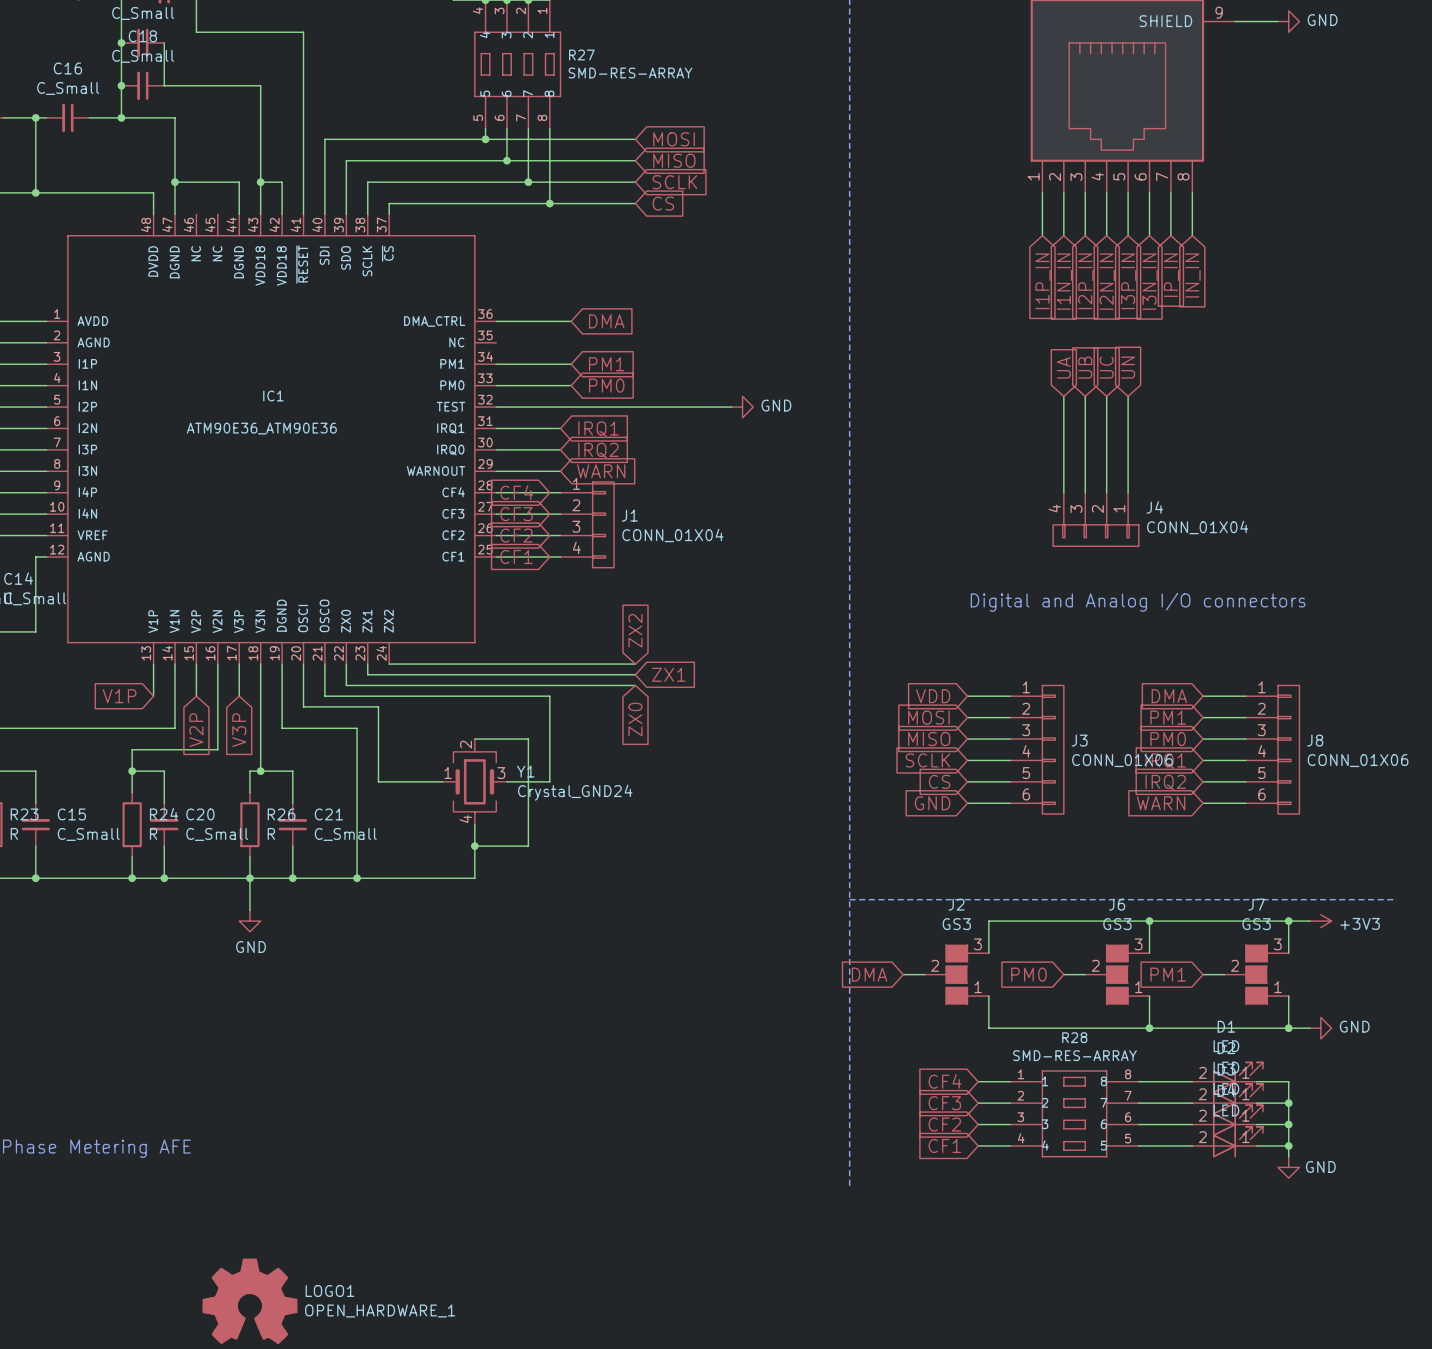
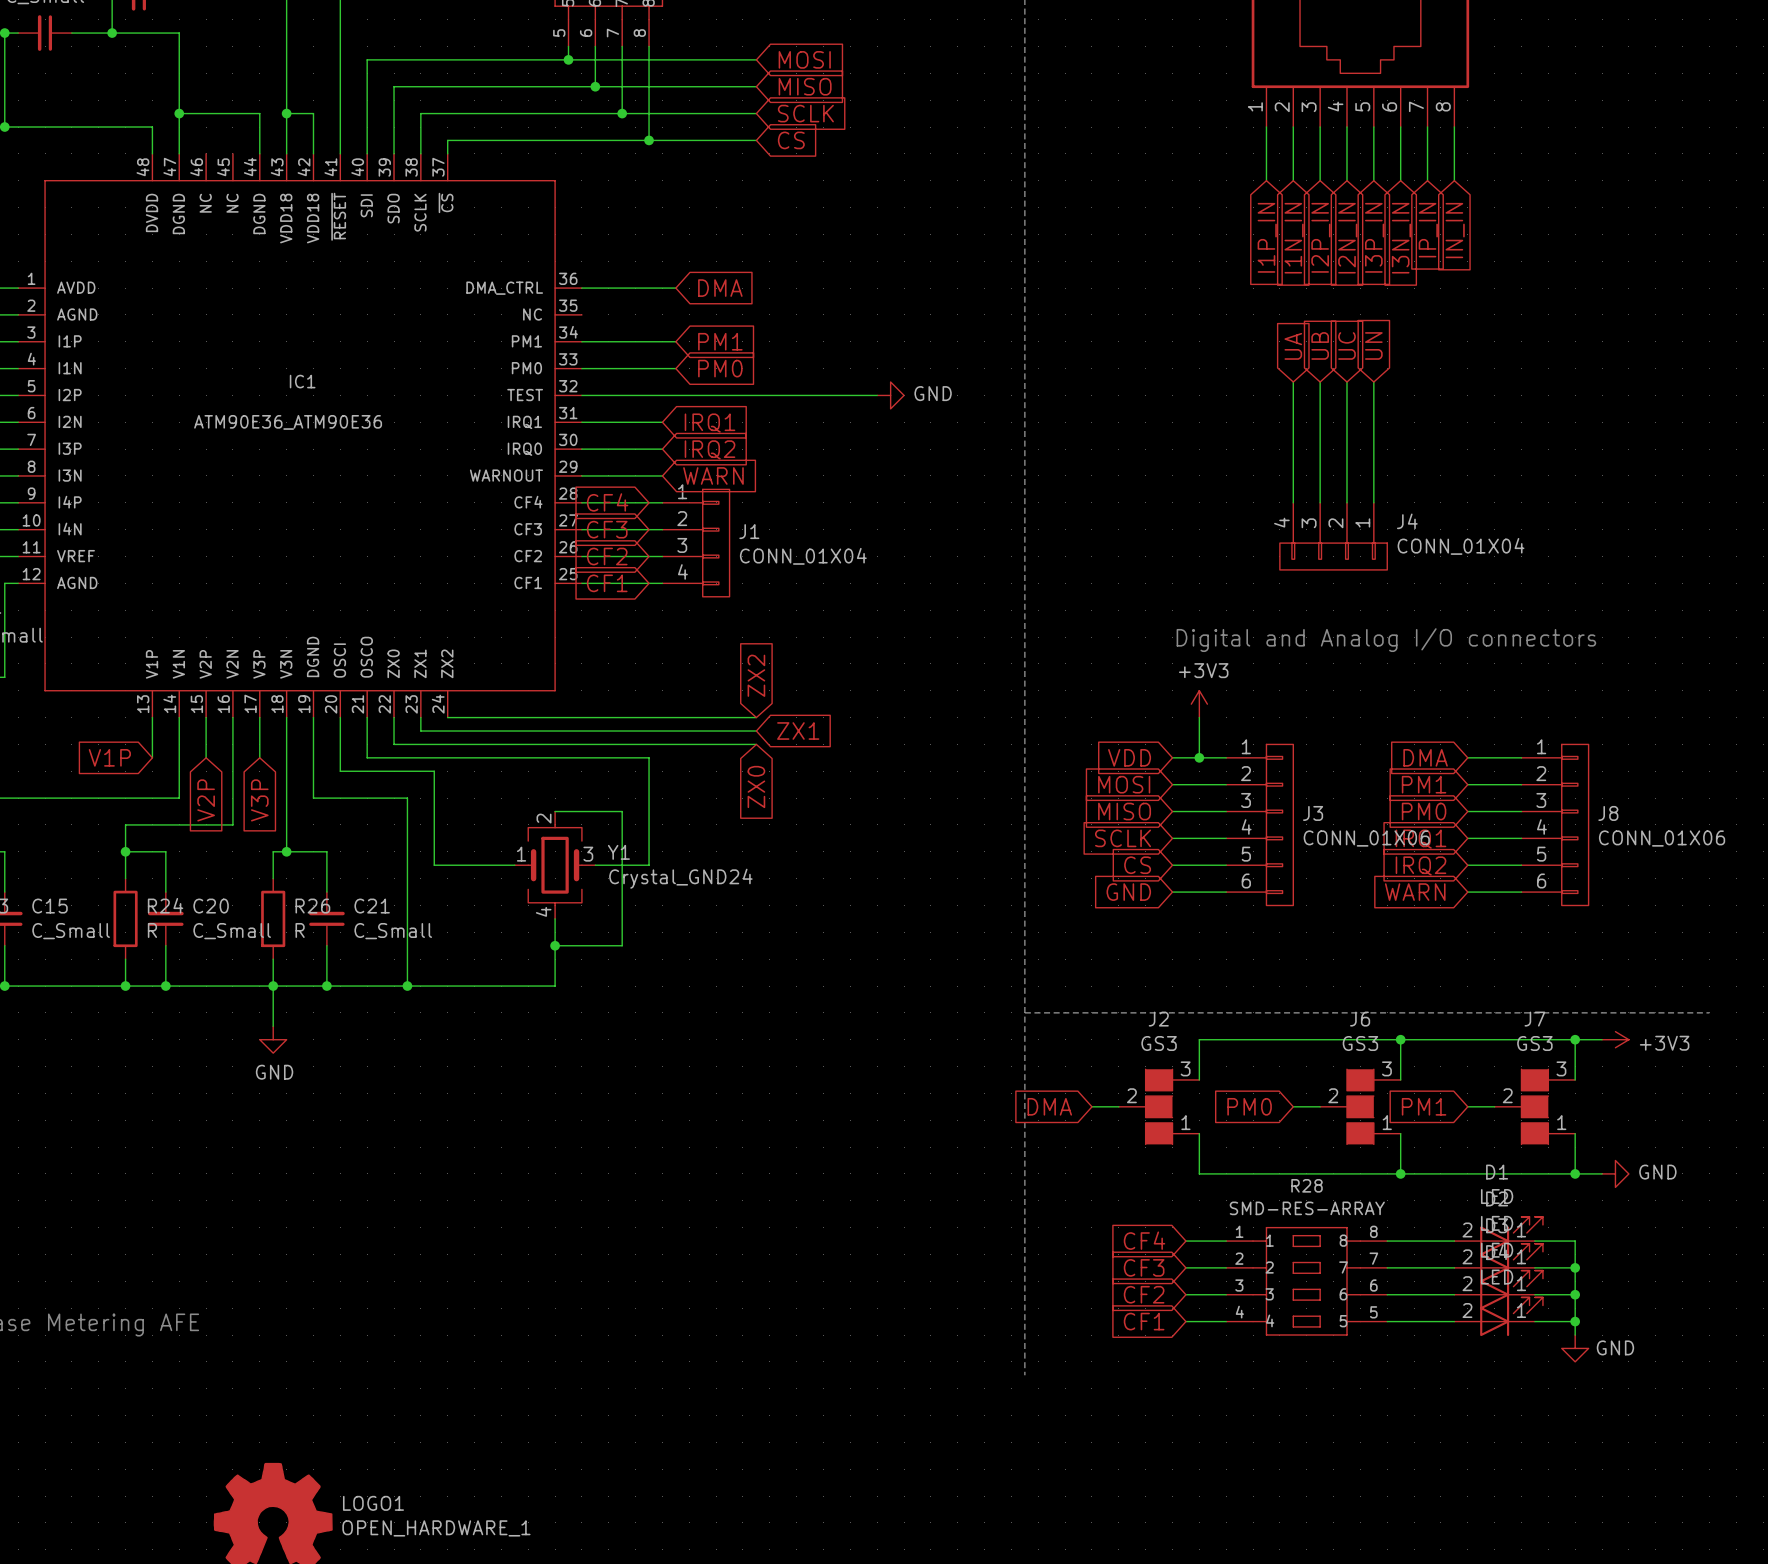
power symbol: none -> +3V3 (1199, 704)
wire: none -> (1199, 717) (1199, 757)
junction: none -> (1199, 757)

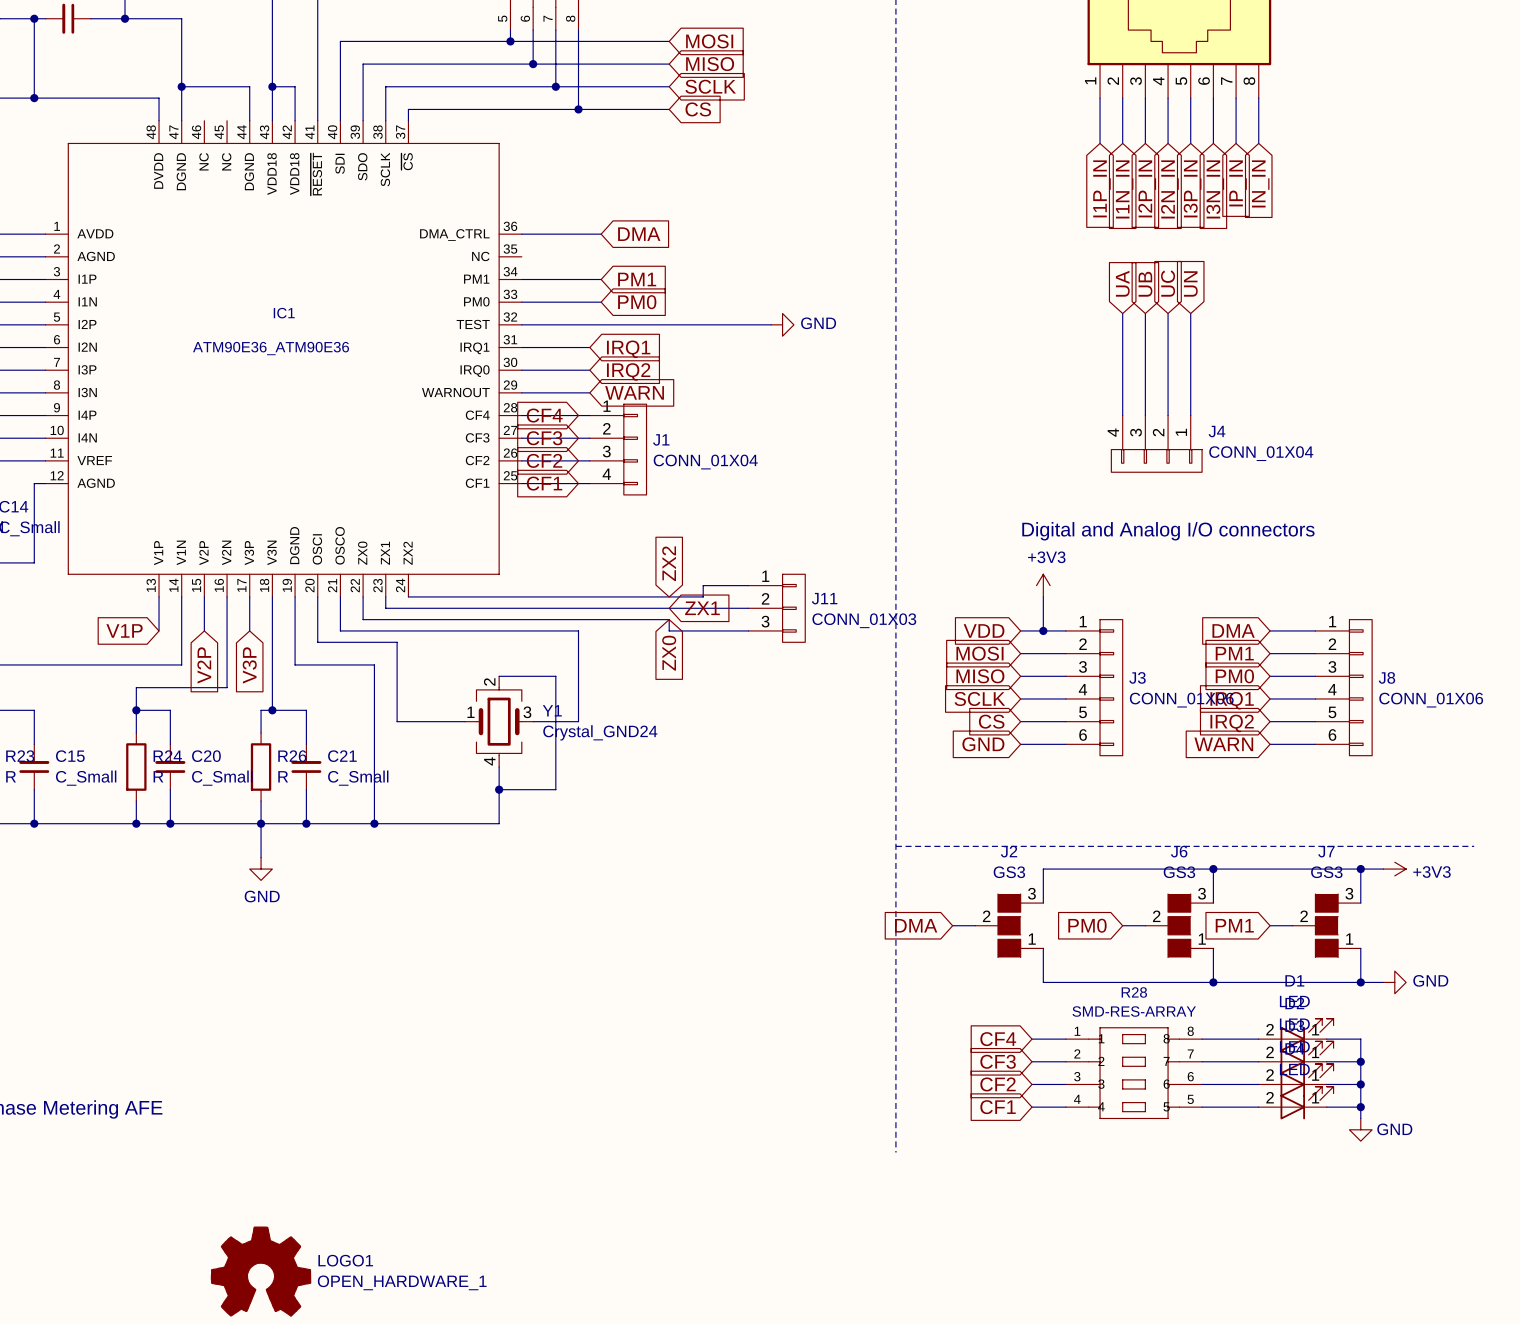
wire: none -> (748, 585) (703, 585) (703, 596) (669, 596)
wire: none -> (669, 608) (748, 608)
J11: none -> CONN_01X03 (776, 608)
wire: none -> (669, 619) (669, 630) (748, 630)

